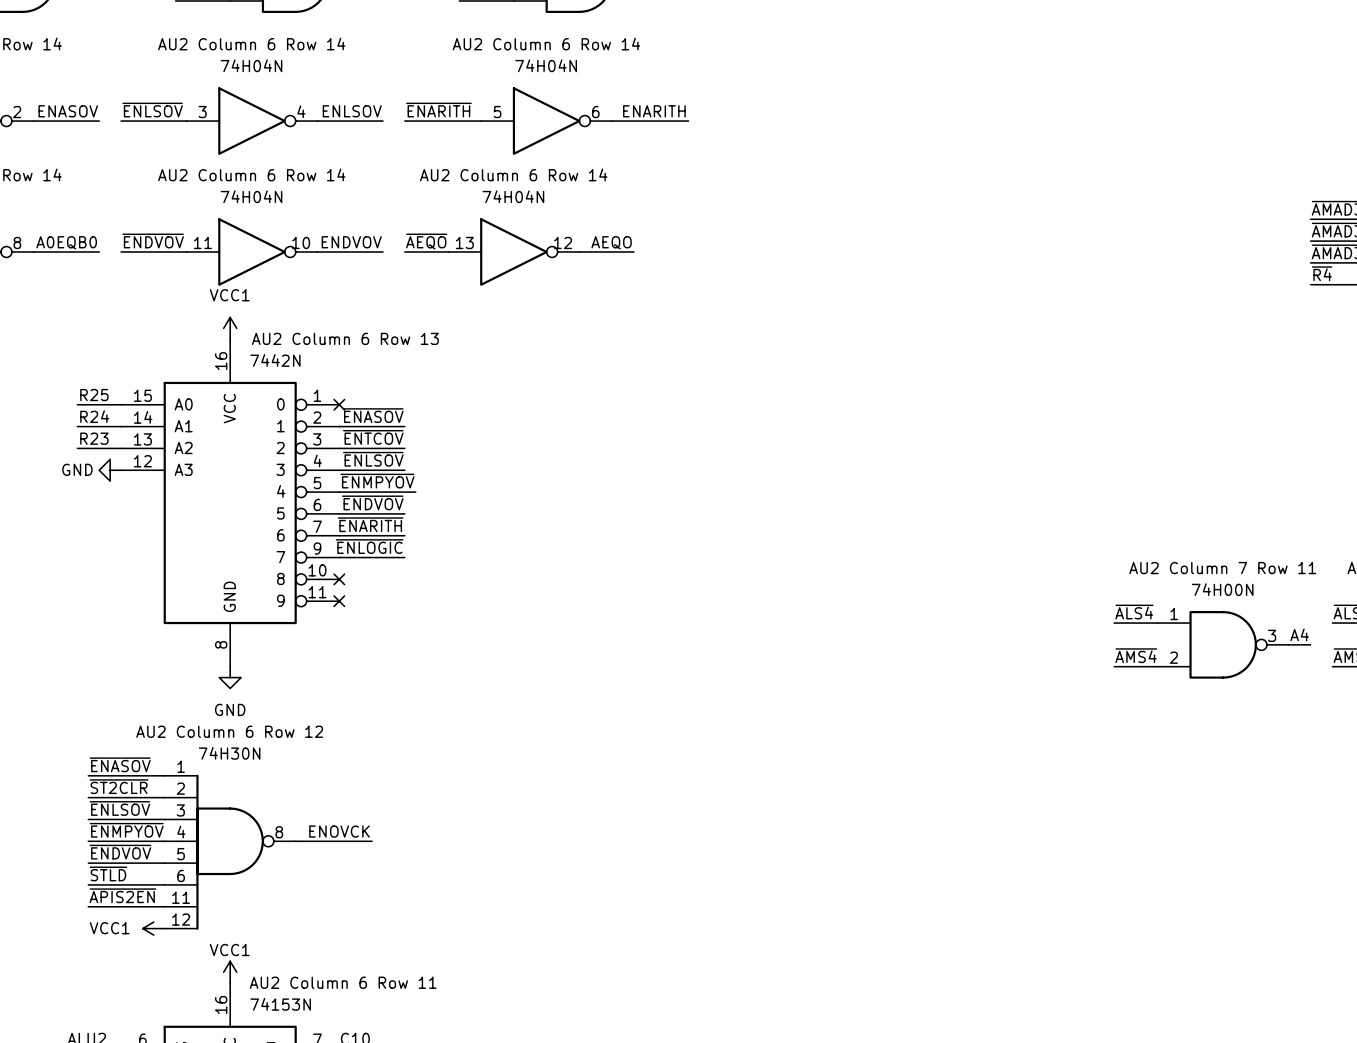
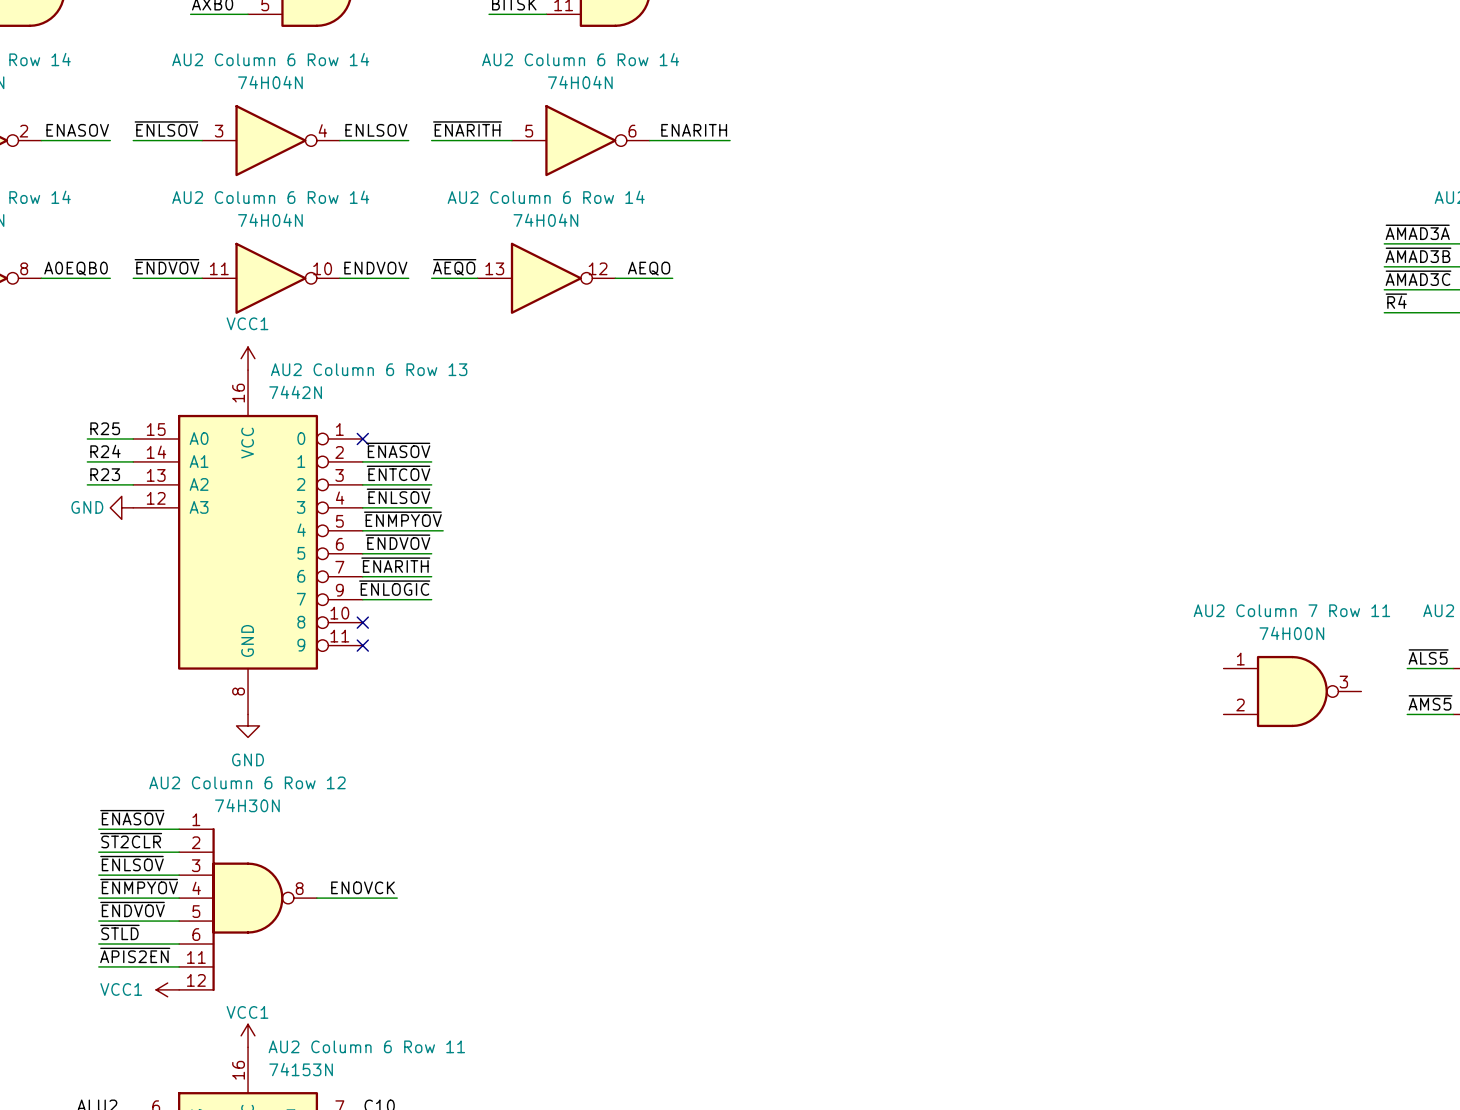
label: ~{ALS4} (1134, 612) -> none
wire: (1114, 623) (1157, 623) -> none
label: A4 (1299, 634) -> none
wire: (1288, 644) (1310, 644) -> none
label: ~{AMS4} (1136, 655) -> none
wire: (1114, 666) (1157, 666) -> none

